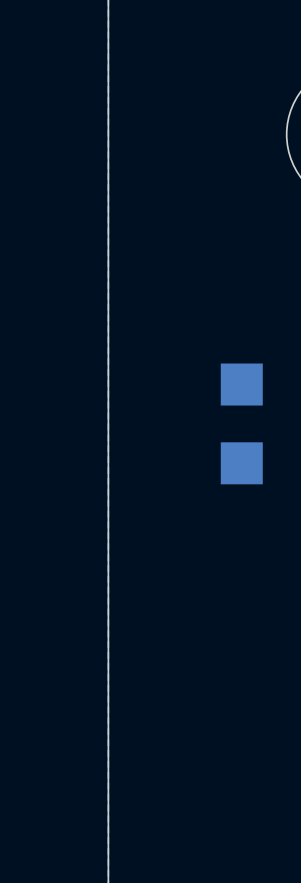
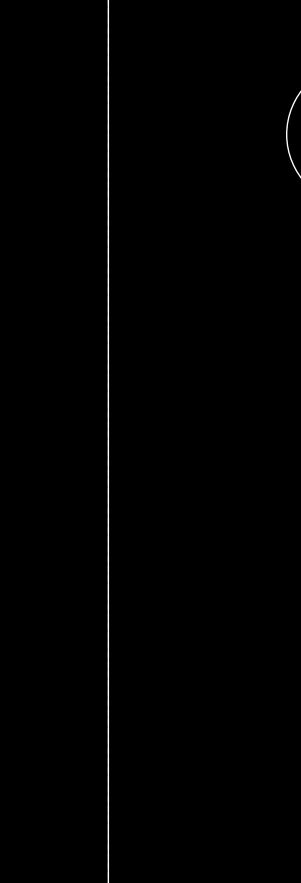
part: (241, 423) -> none

